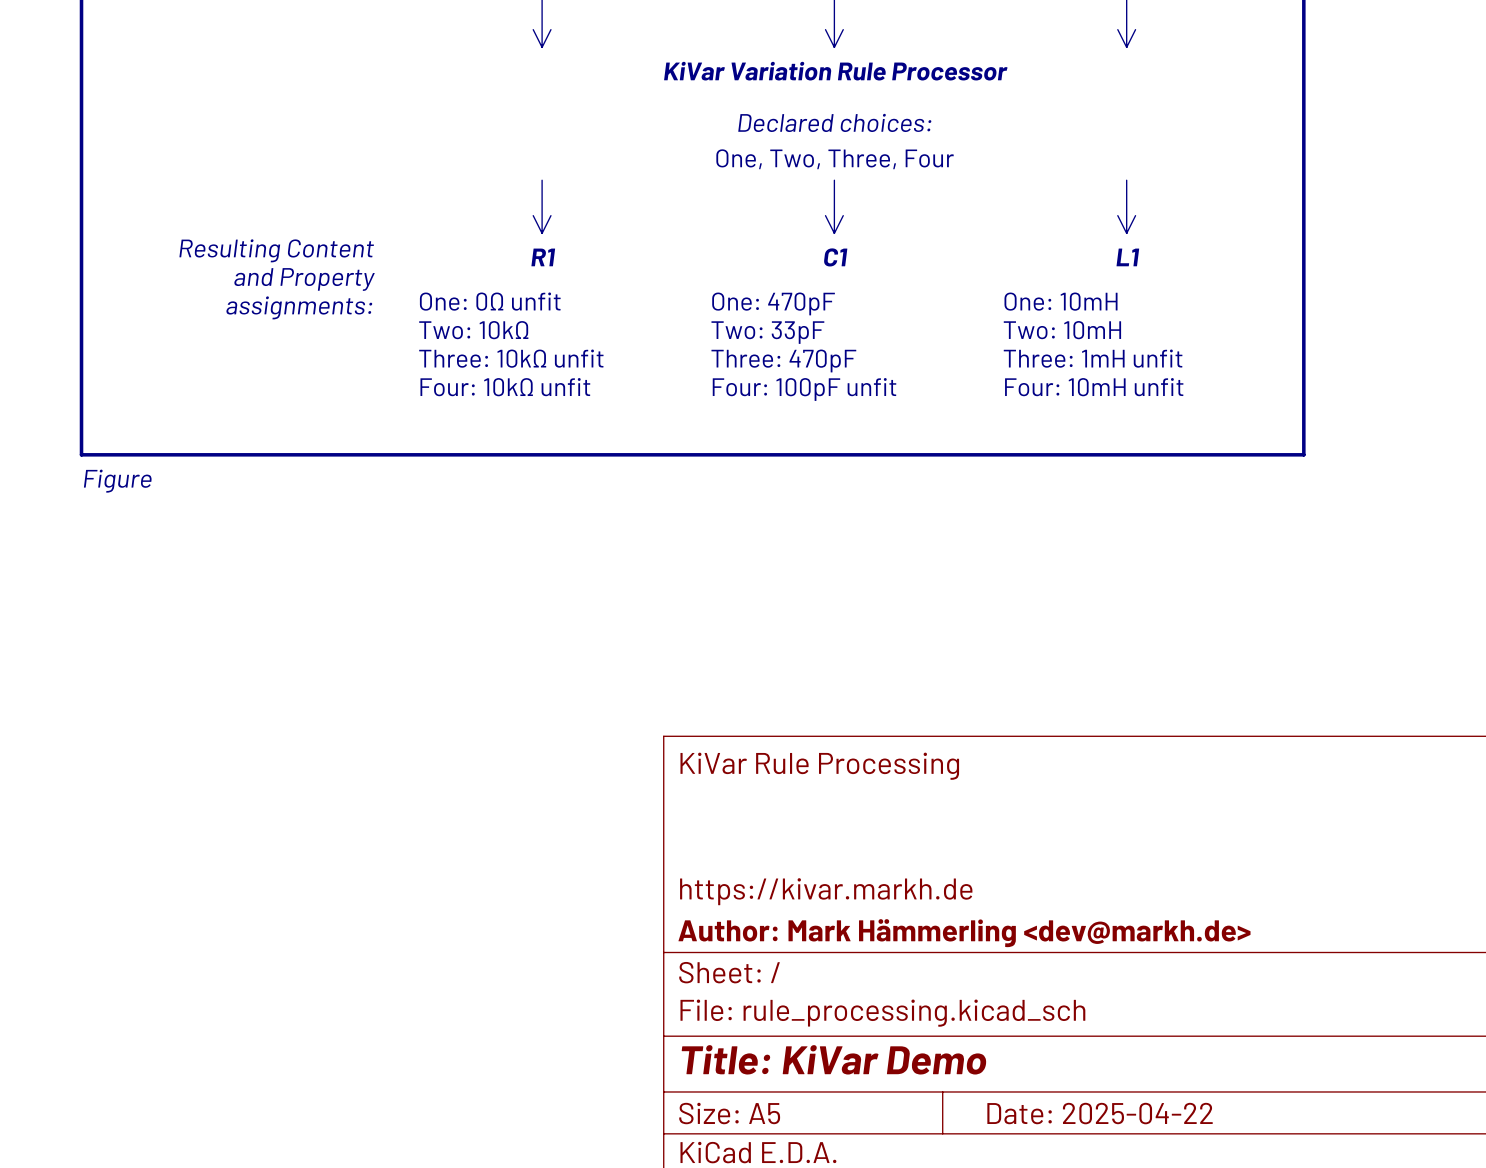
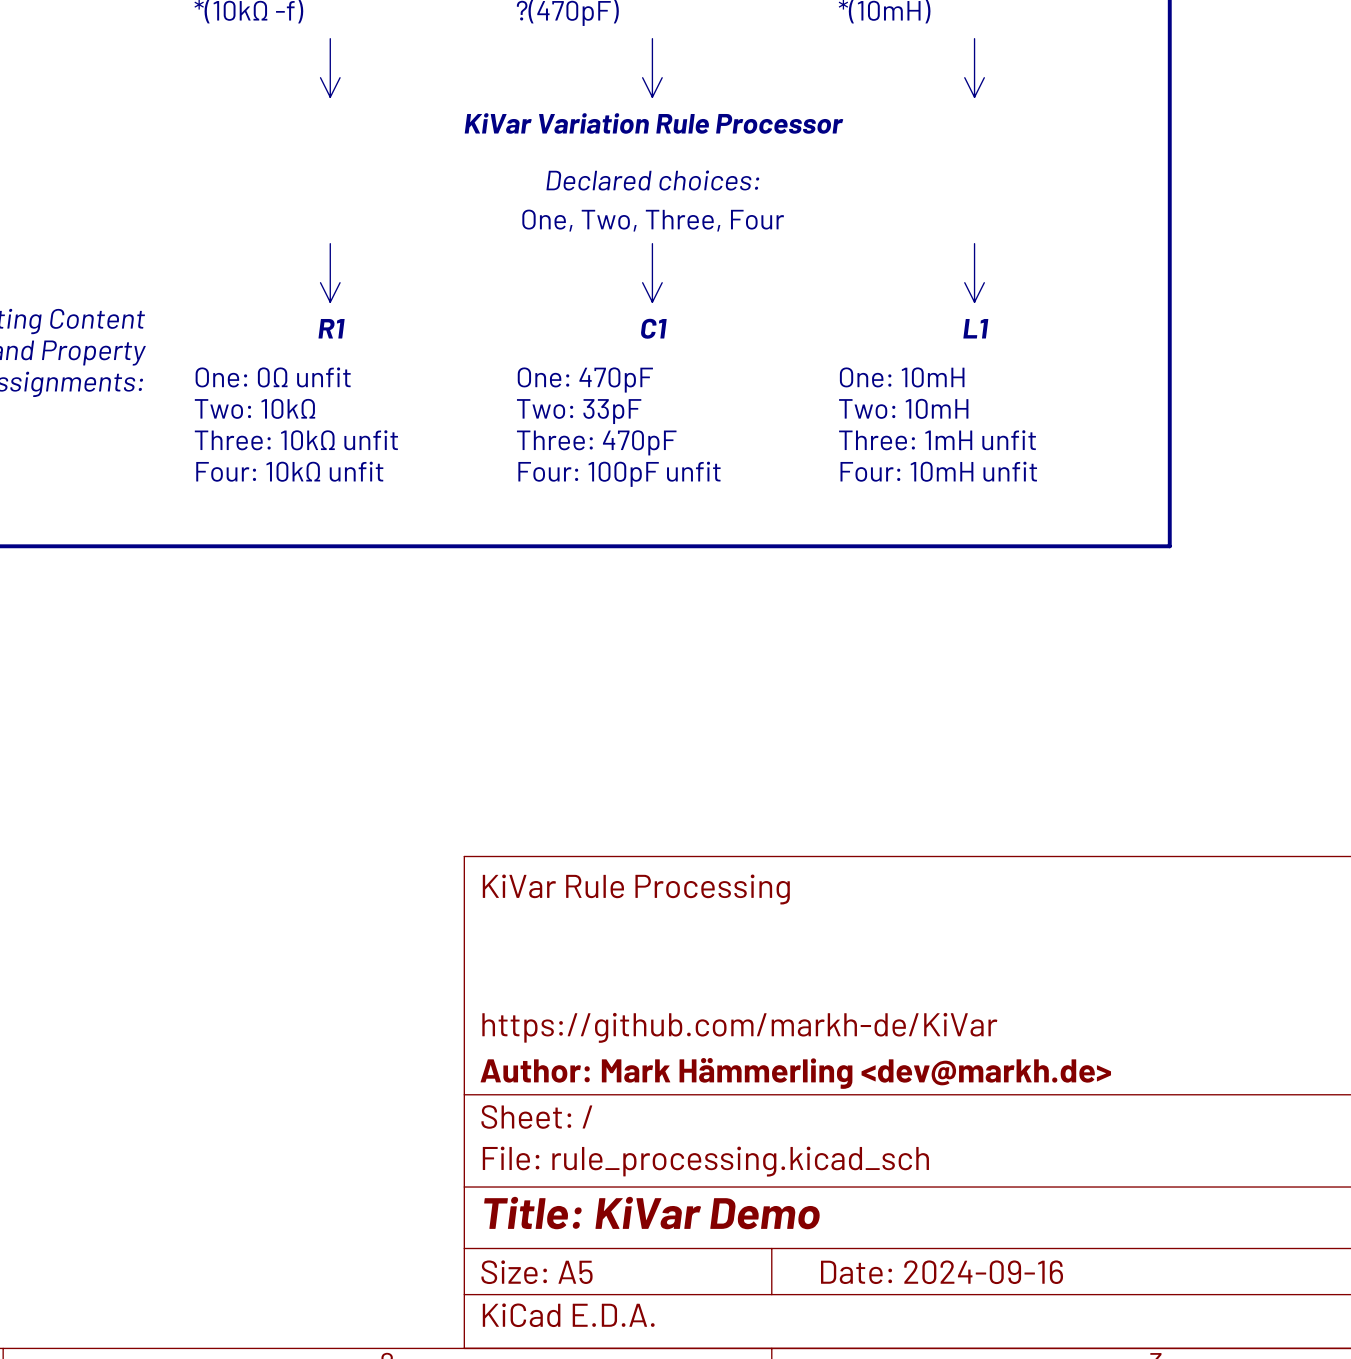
title block: https://kivar.markh.de (826, 891) -> https://github.com/markh-de/KiVar (739, 1027)
title block: Date: 2025-04-22 (1100, 1113) -> Date: 2024-09-16 (942, 1272)

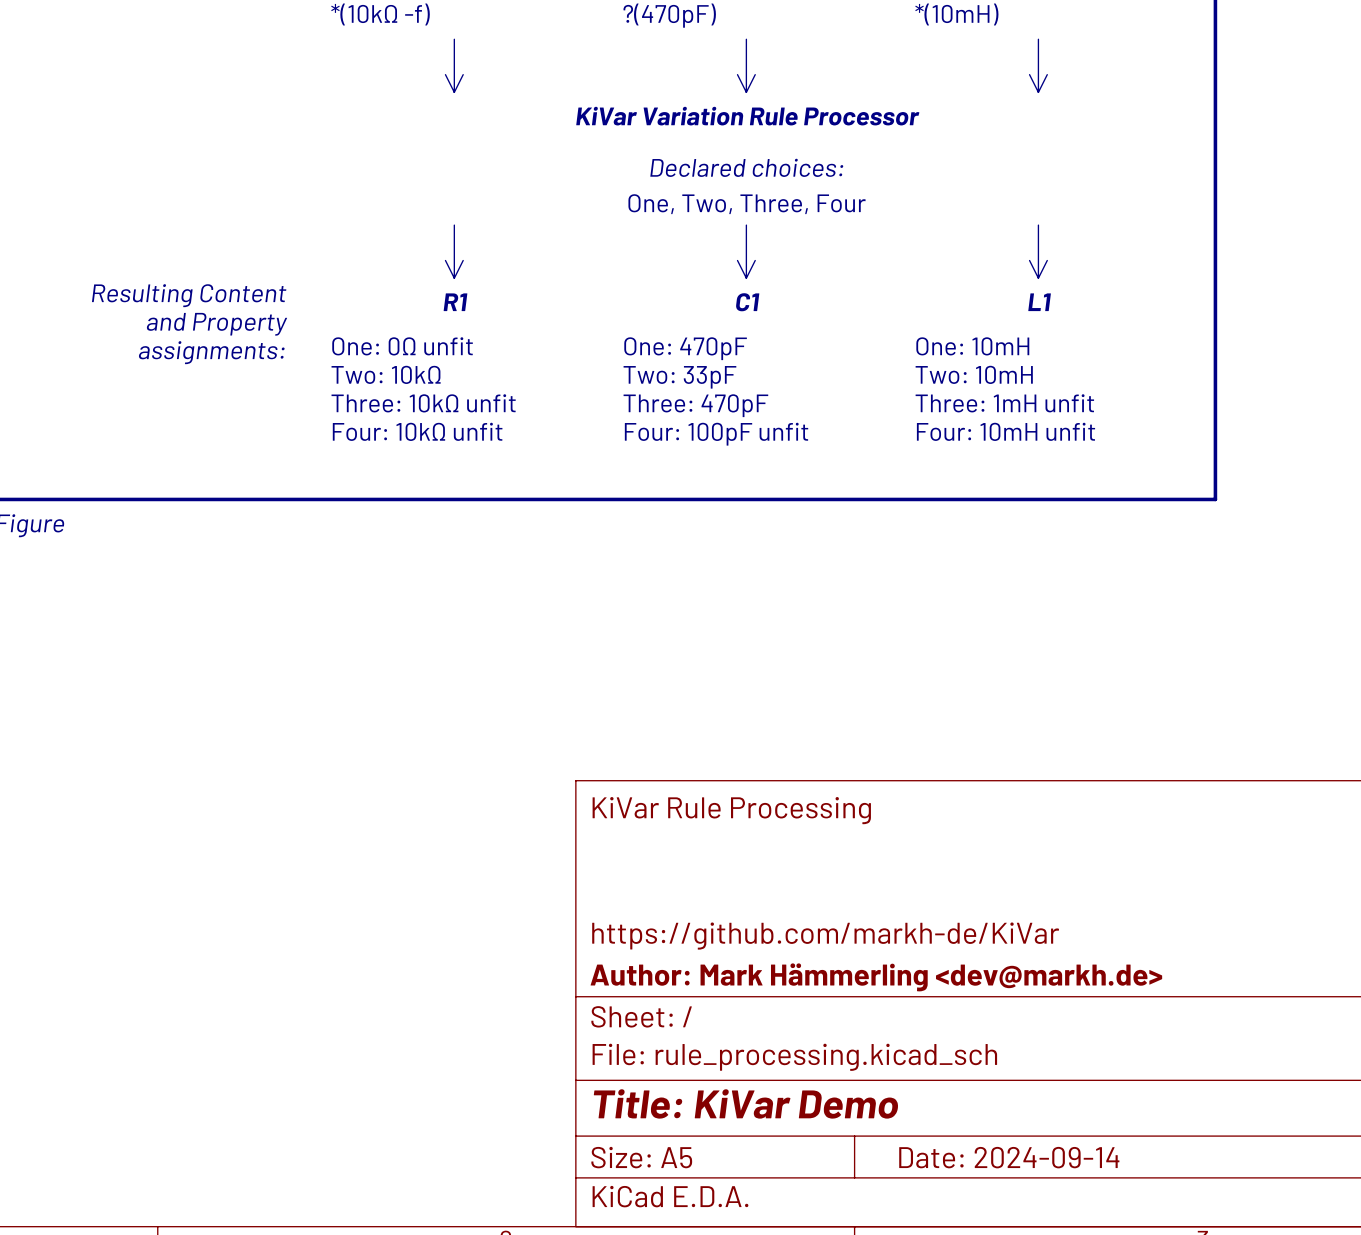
title block: Date: 2024-09-16 (942, 1272) -> Date: 2024-09-14 (1009, 1157)

